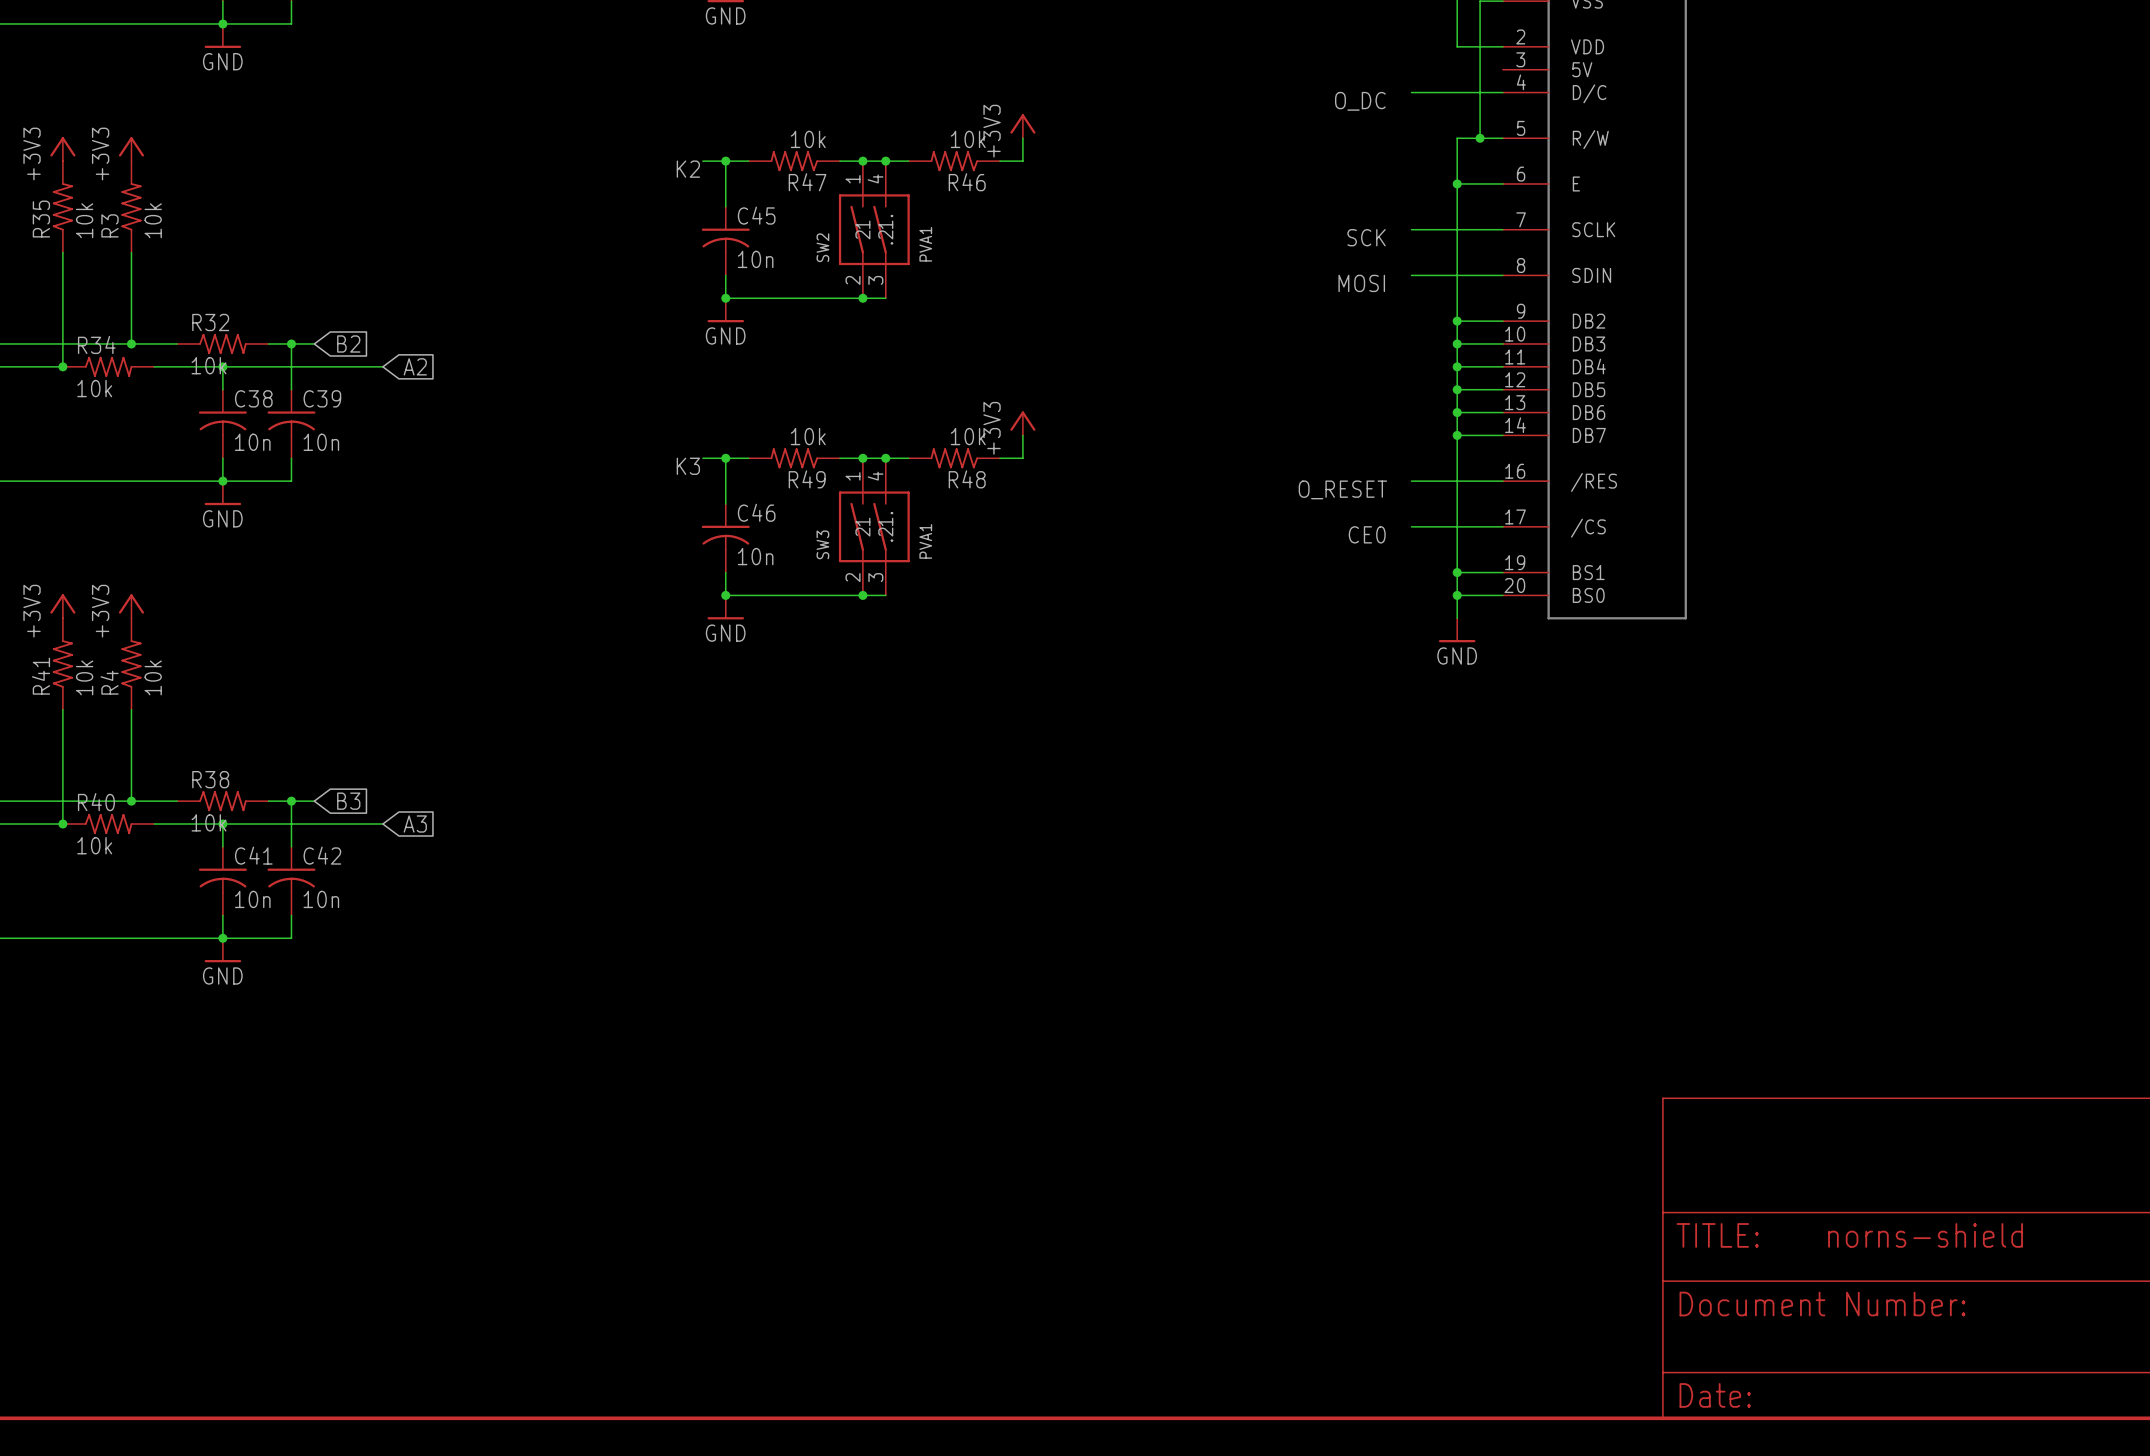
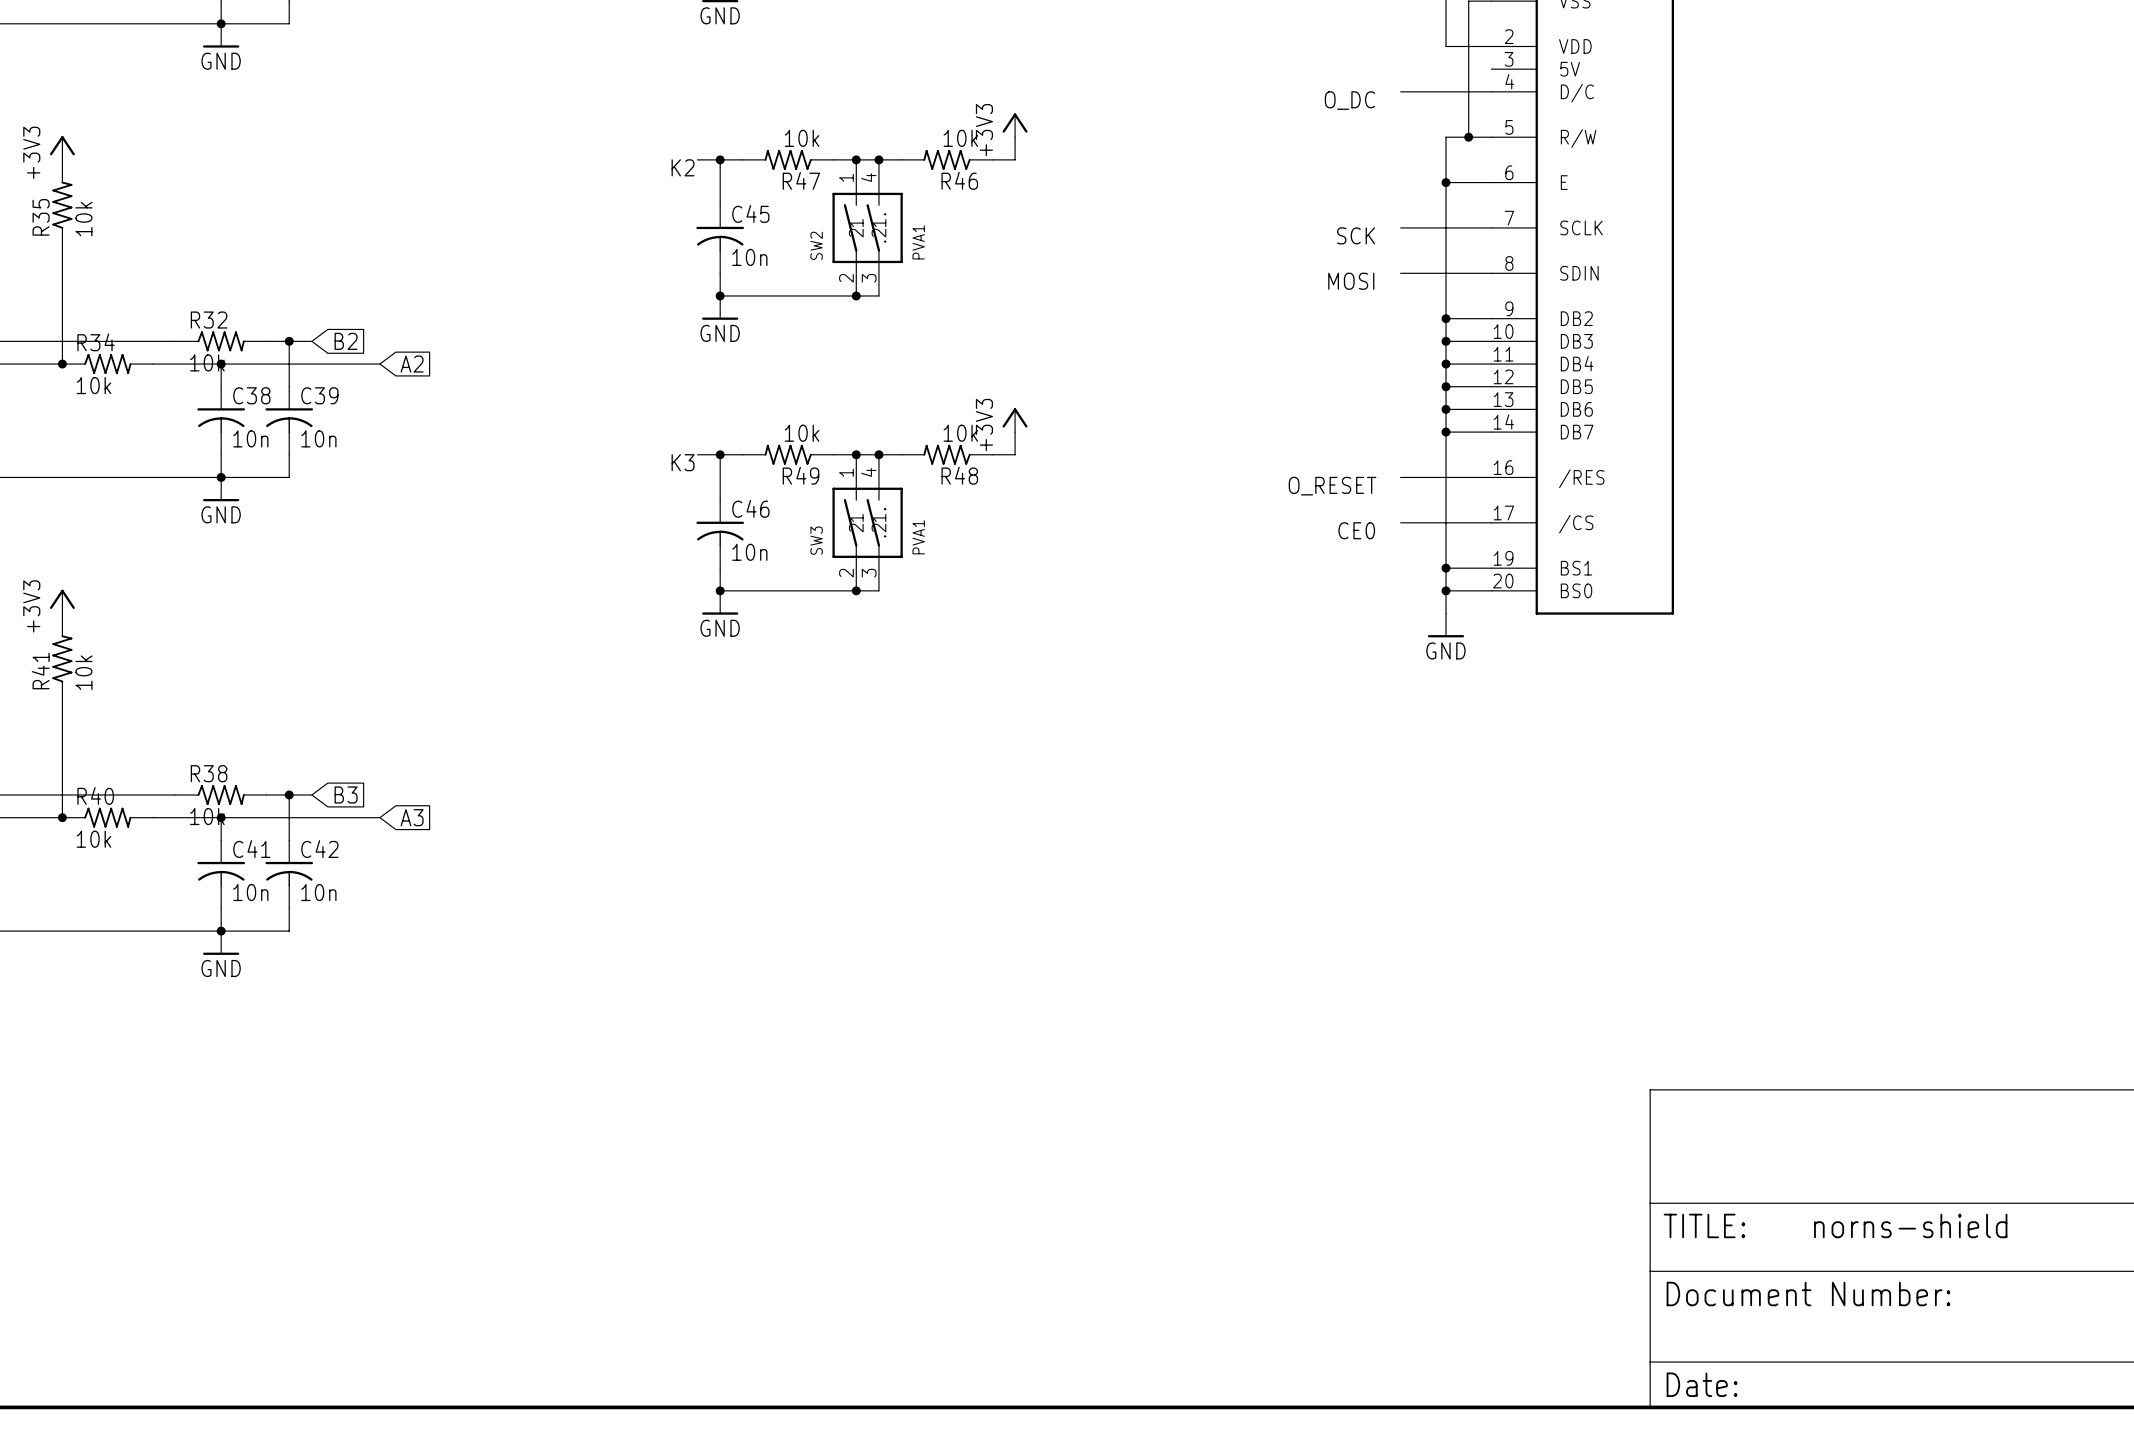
power symbol: +3V3 (131, 149) -> none
R3: 10k (131, 206) -> none
wire: (131, 252) (131, 343) -> none
junction: (131, 343) -> none
power symbol: +3V3 (131, 606) -> none
R4: 10k (131, 664) -> none
wire: (131, 709) (131, 801) -> none
junction: (131, 801) -> none

